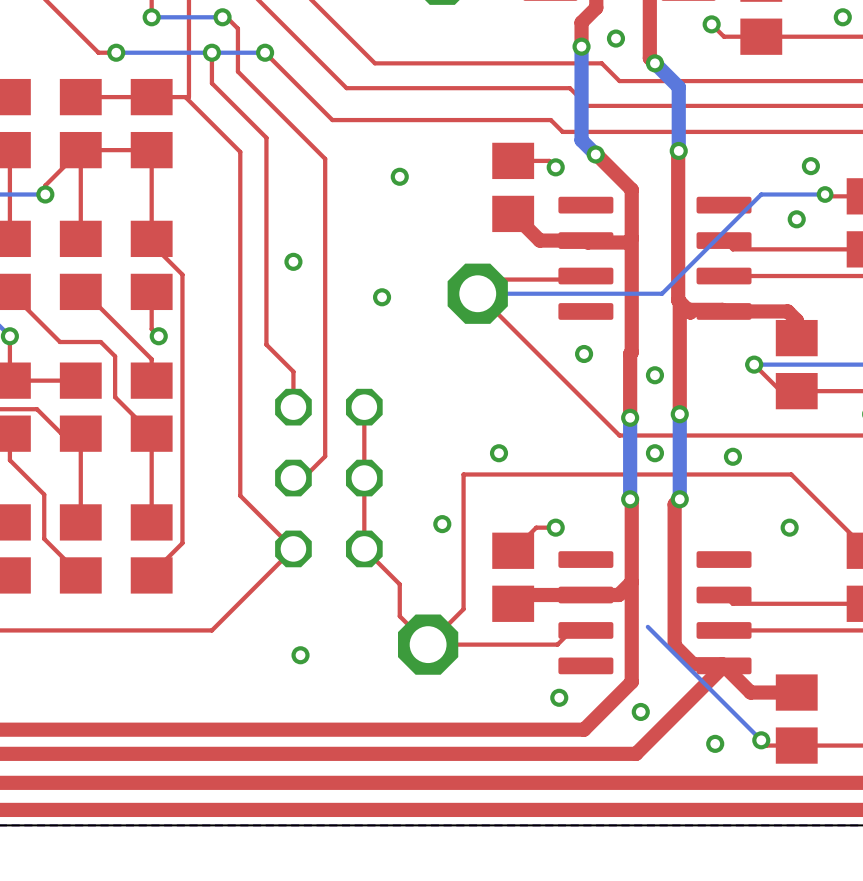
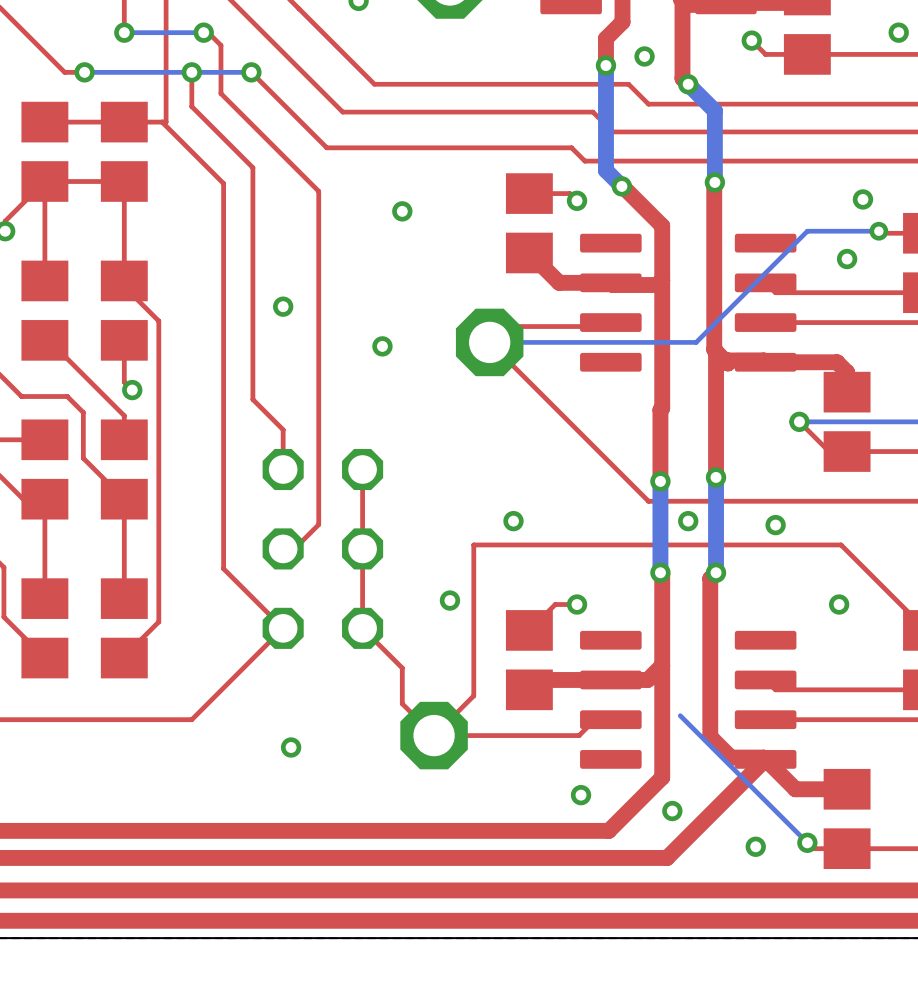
via: (584, 353) -> none
via: (654, 375) -> none

